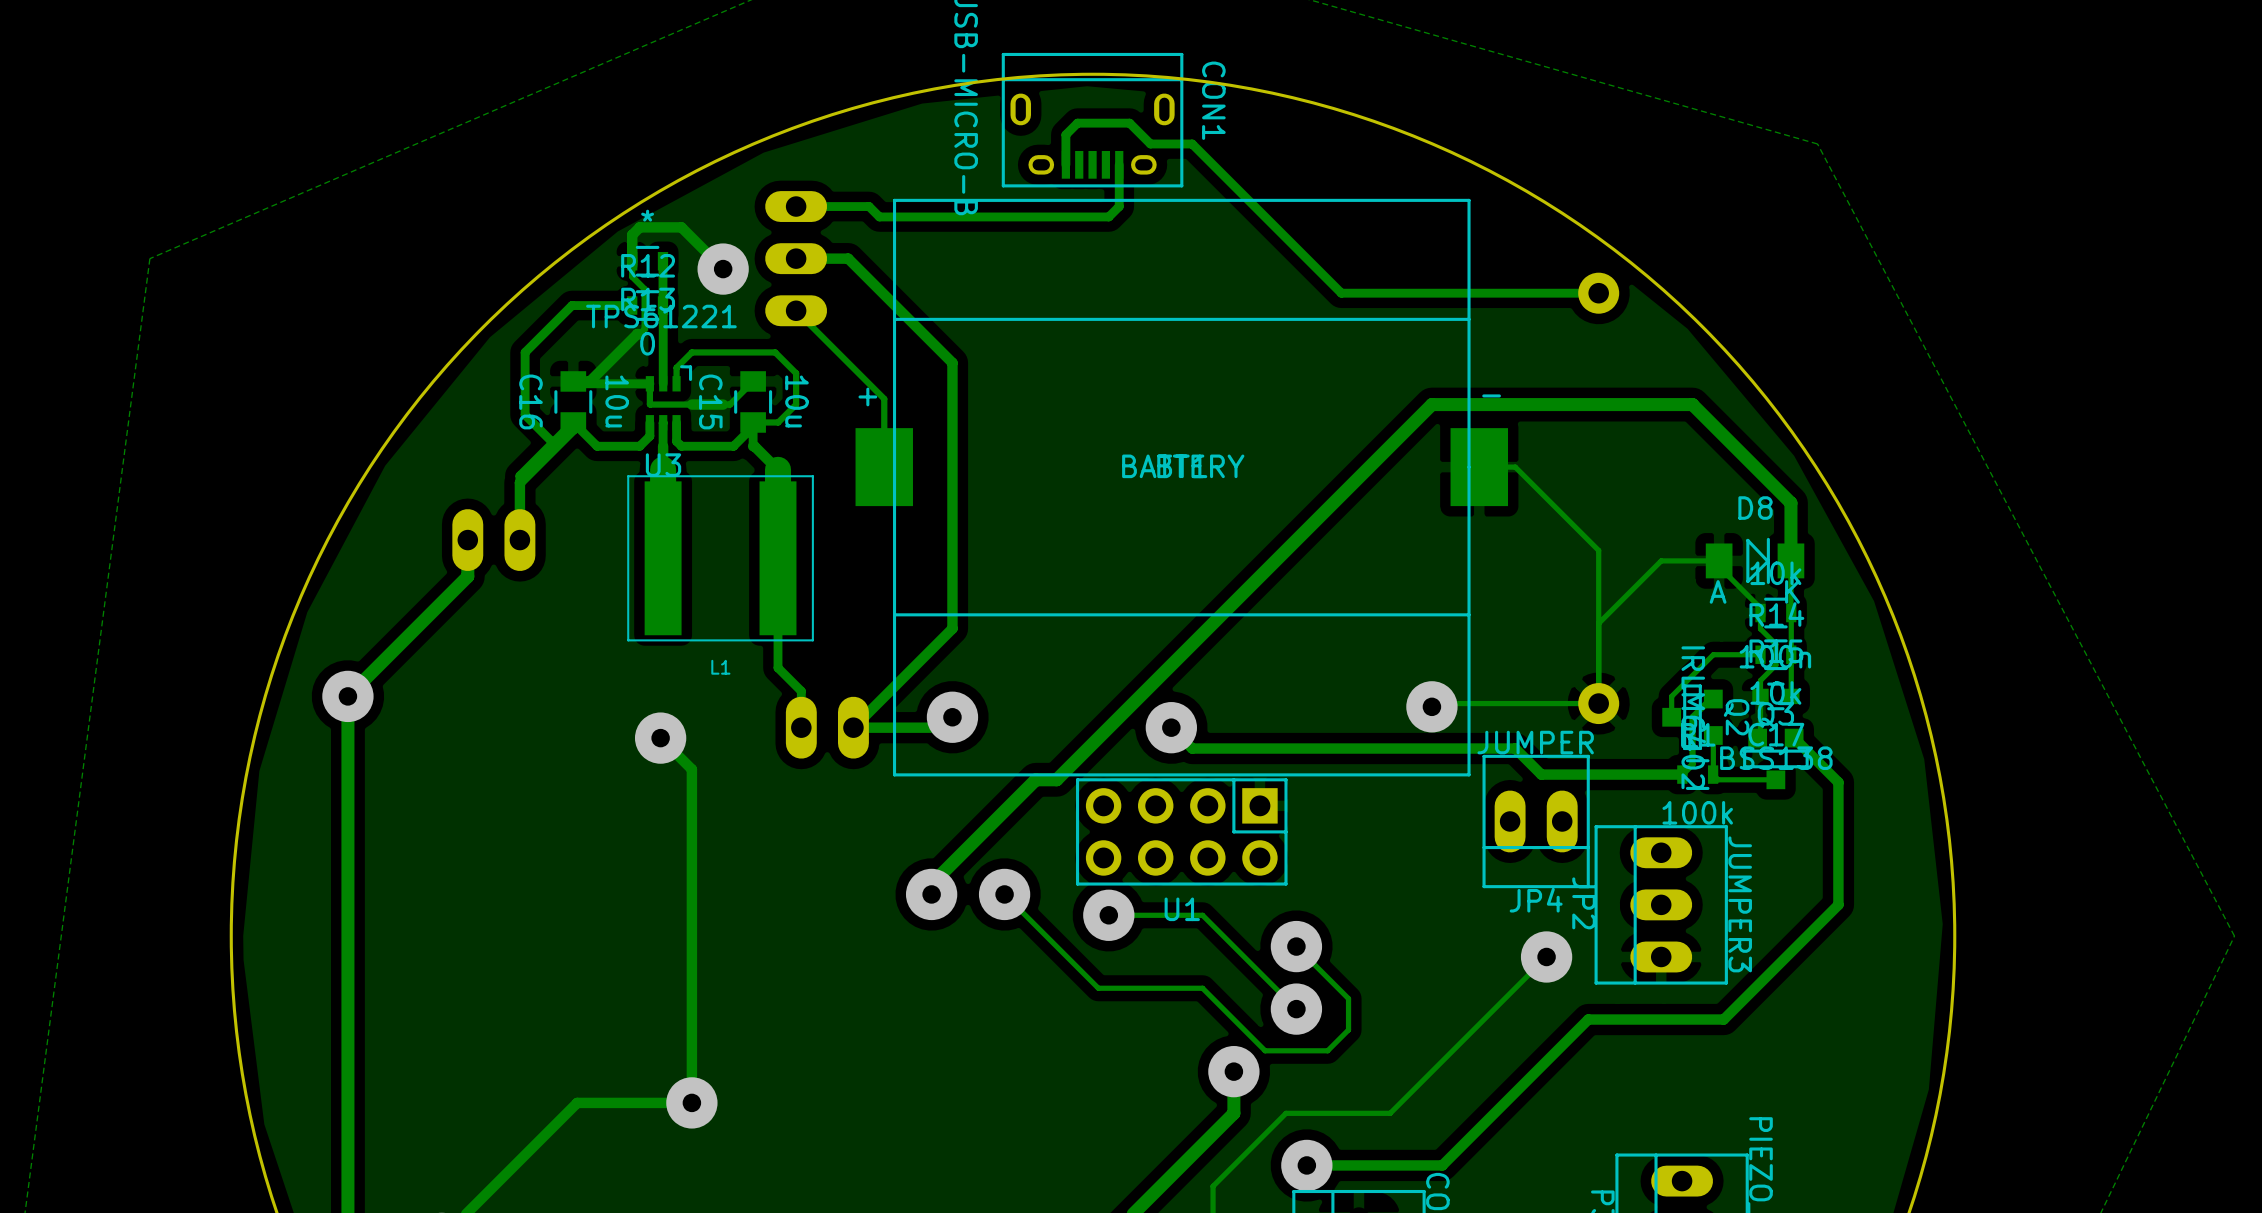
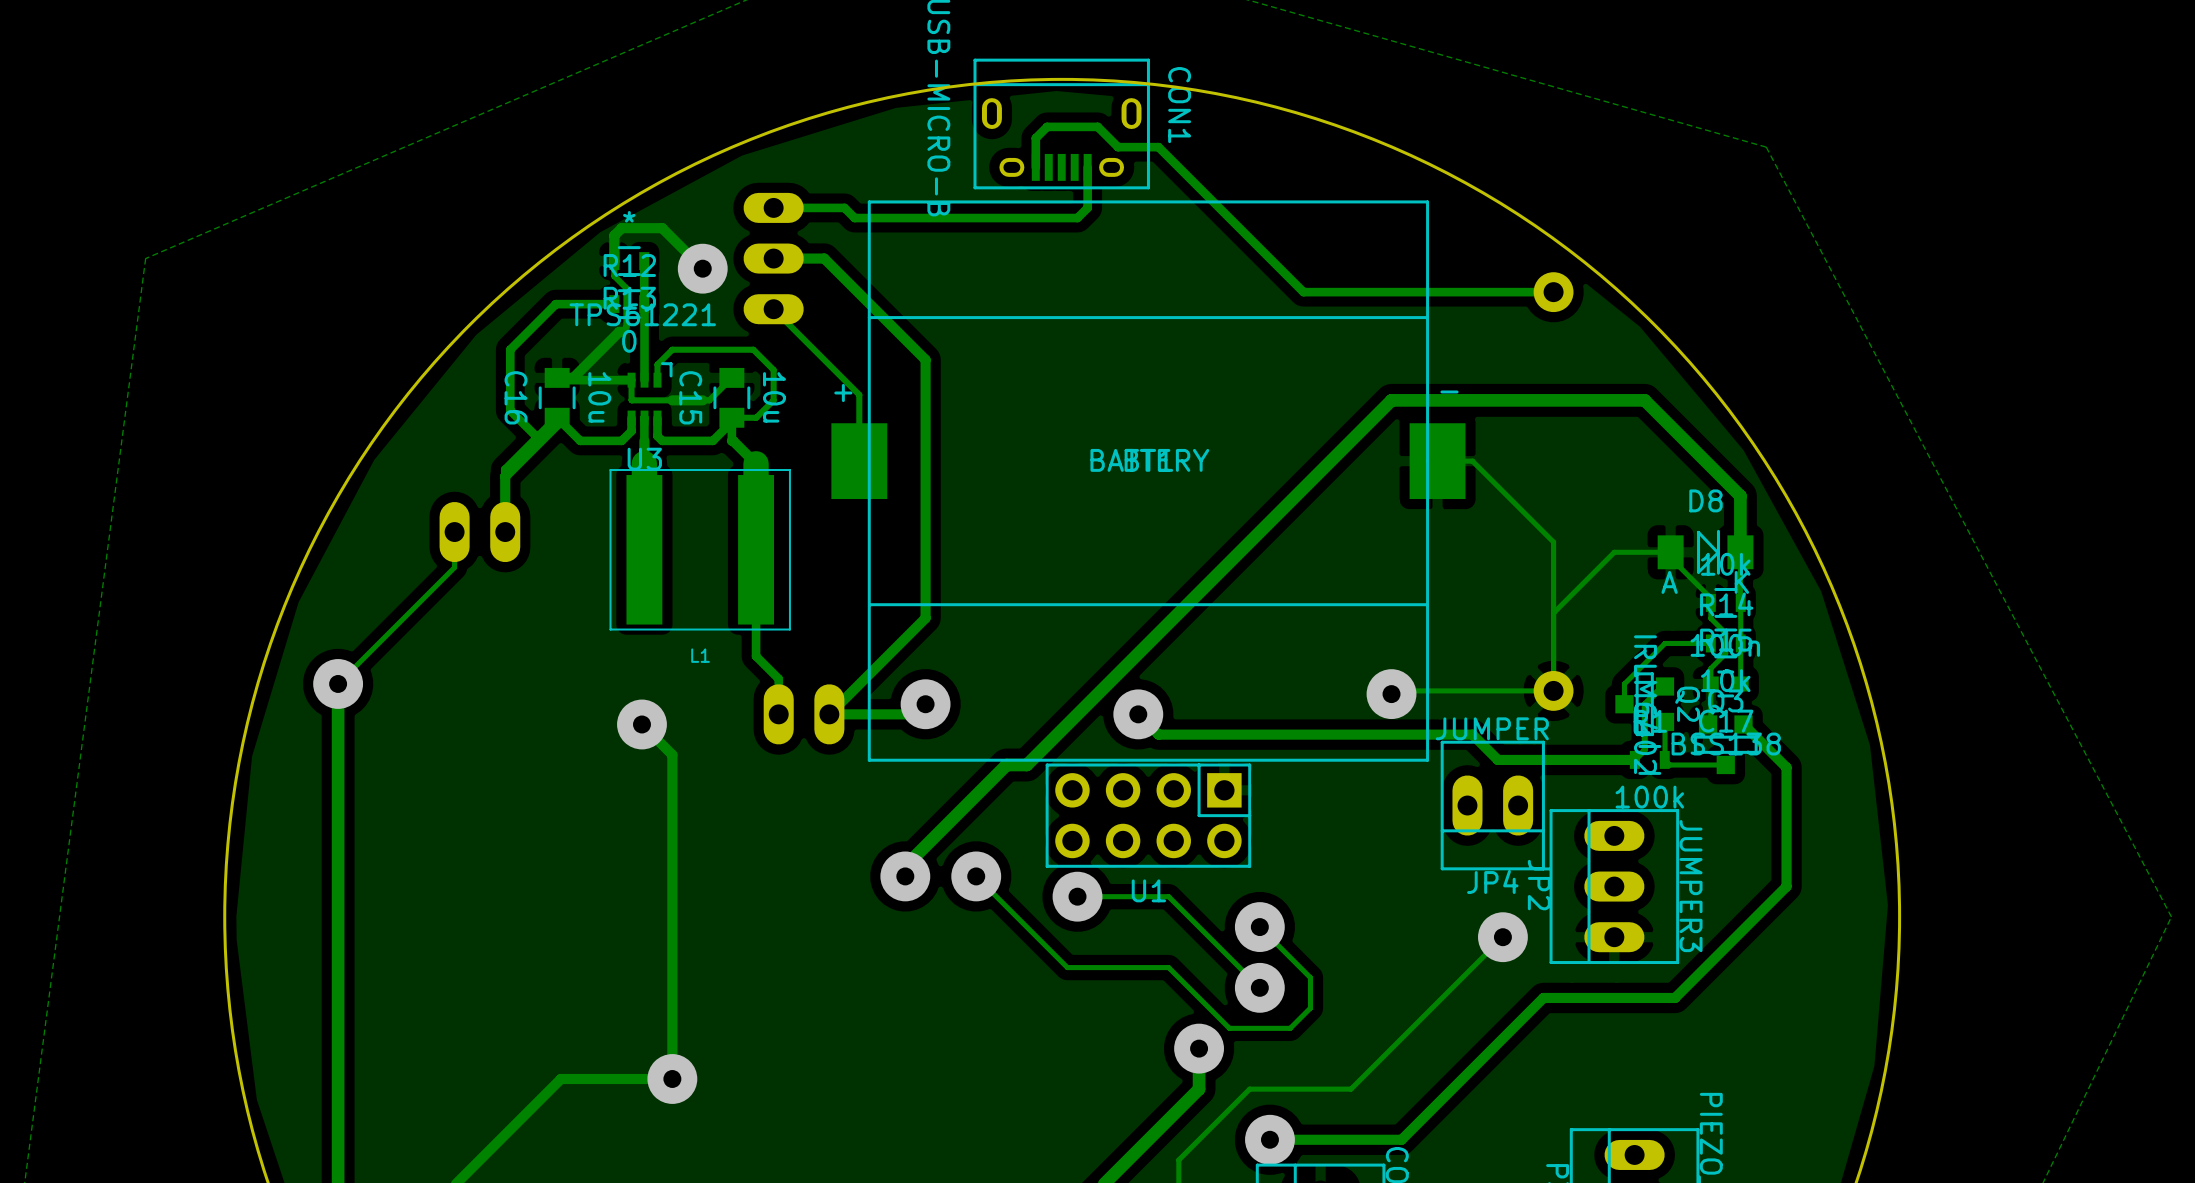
track width: thick (467, 540) (467, 576) (347, 696) -> thin (454, 532) (454, 567) (338, 683)

